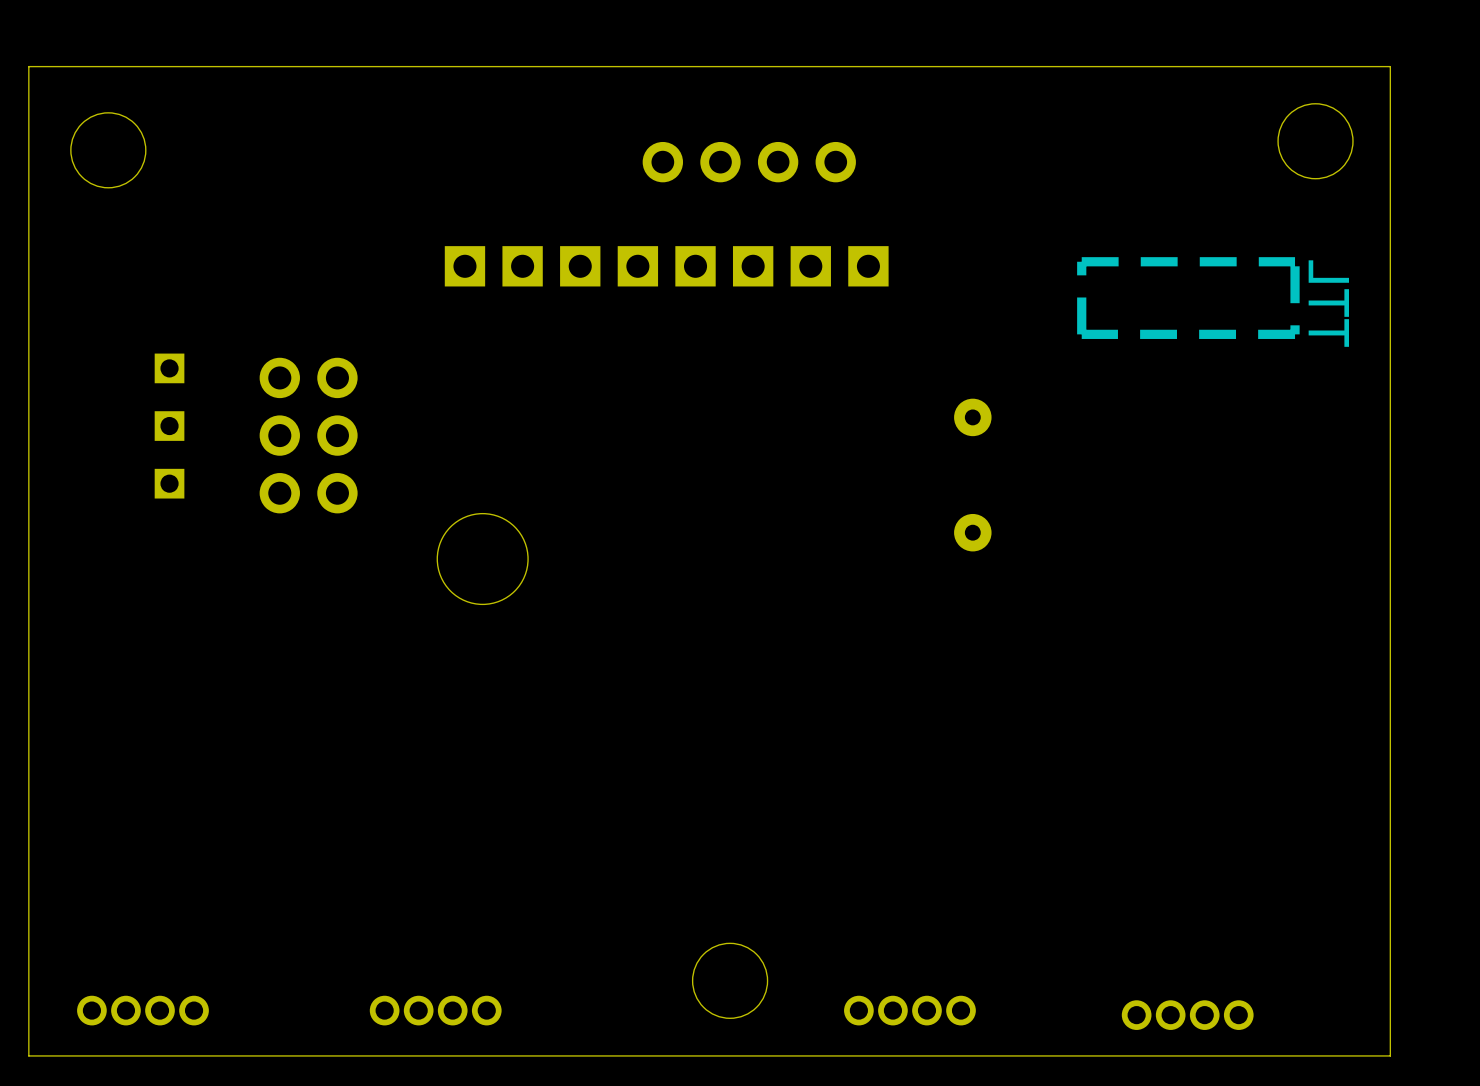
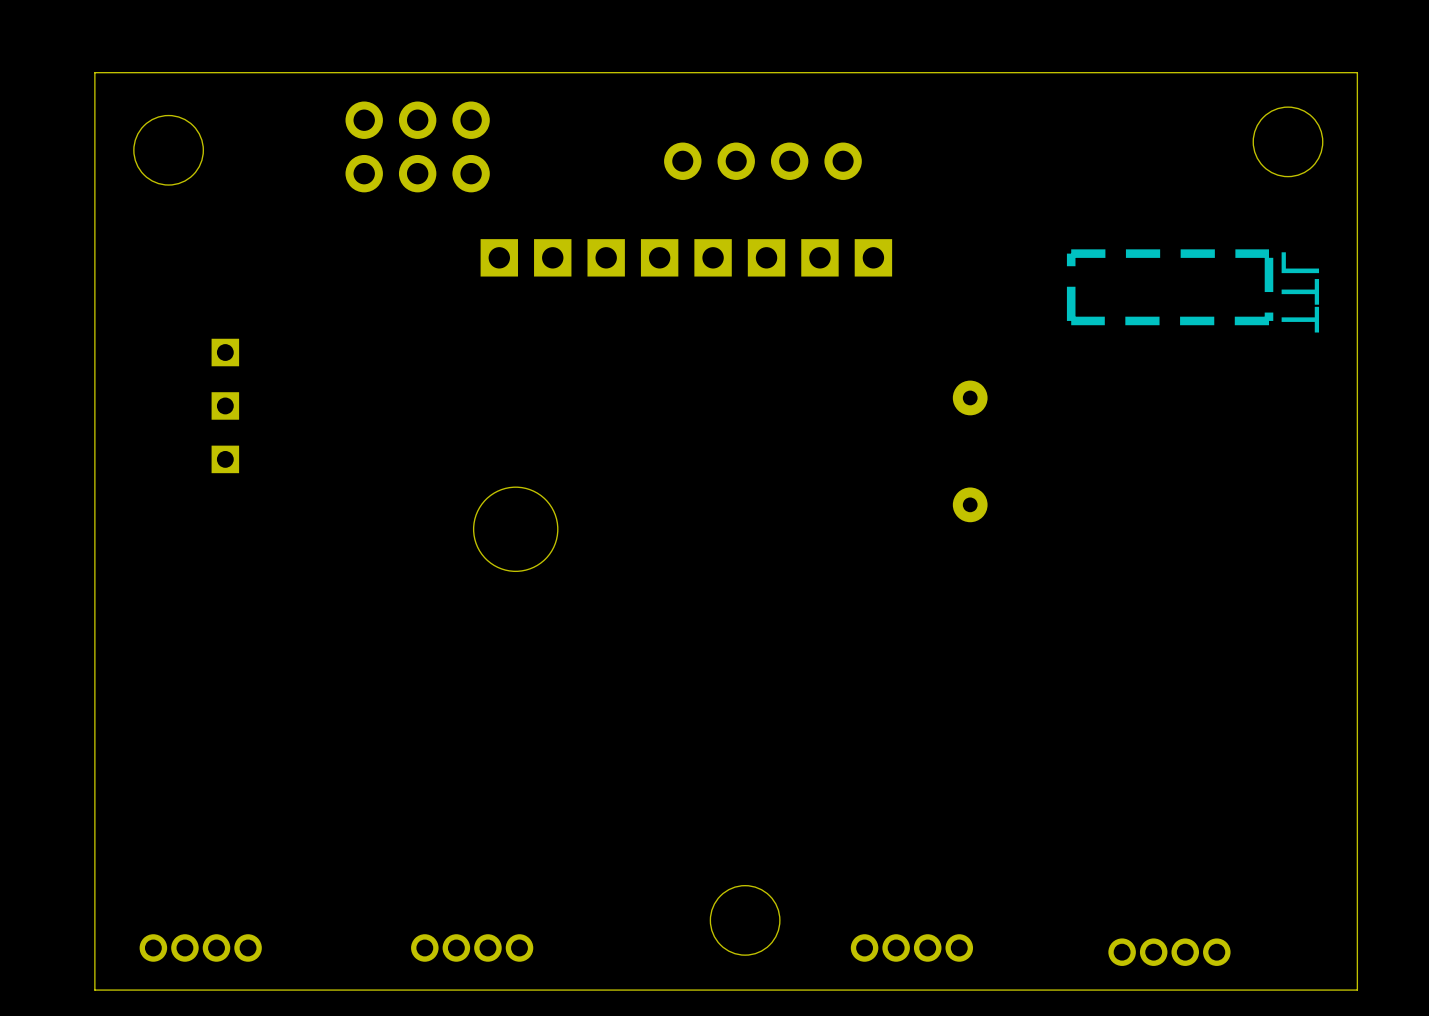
part rotation: 0° (308, 435) -> 90° clockwise (417, 146)
part position: (308, 435) -> (417, 146)

